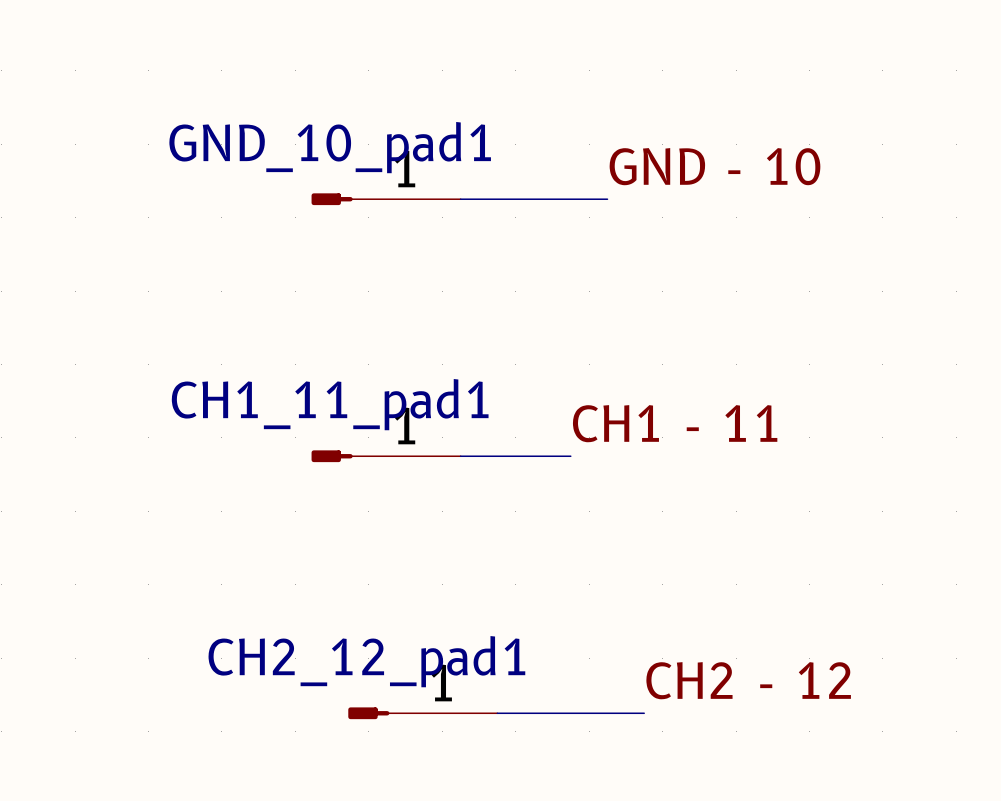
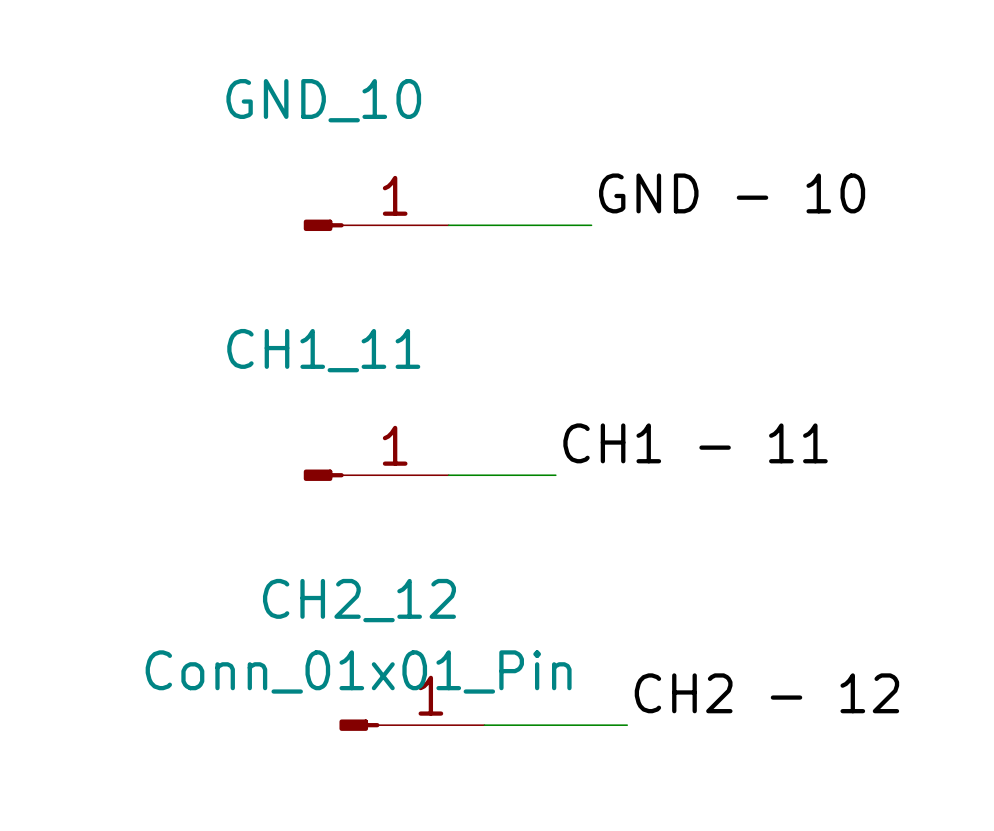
GND_10_pad1 name: GND_10_pad1 (330, 147) -> GND_10 (323, 100)
CH1_11_pad1 name: CH1_11_pad1 (330, 404) -> CH1_11 (323, 350)
CH2_12_pad1 name: CH2_12_pad1 (366, 661) -> CH2_12 (359, 600)
CH2_12_pad1 value: none -> Conn_01x01_Pin (358, 671)

